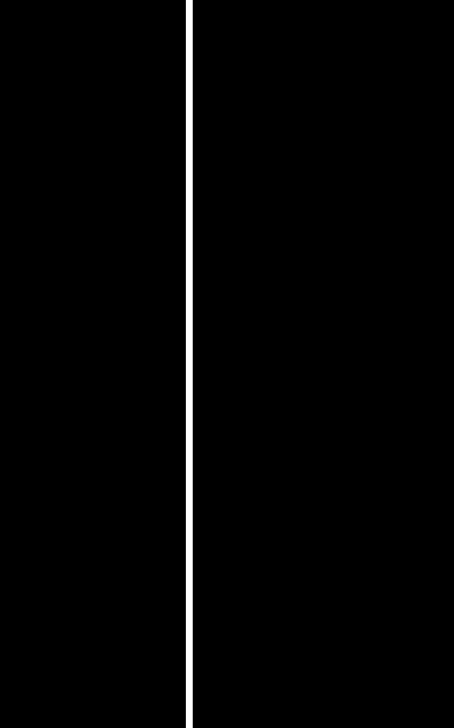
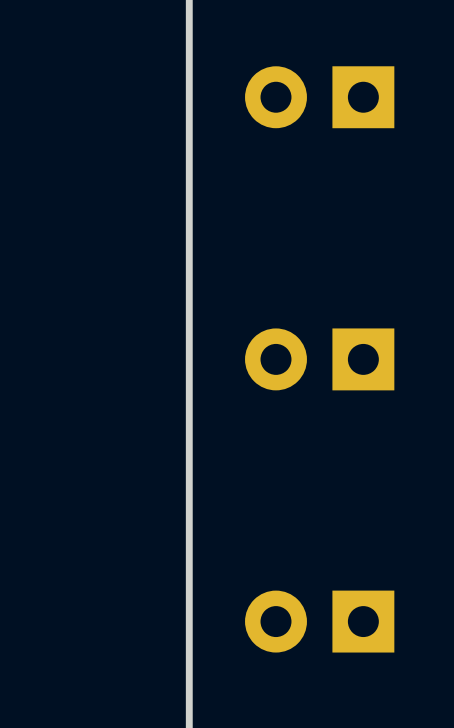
part: none -> (319, 97)
part: none -> (319, 359)
part: none -> (319, 621)

